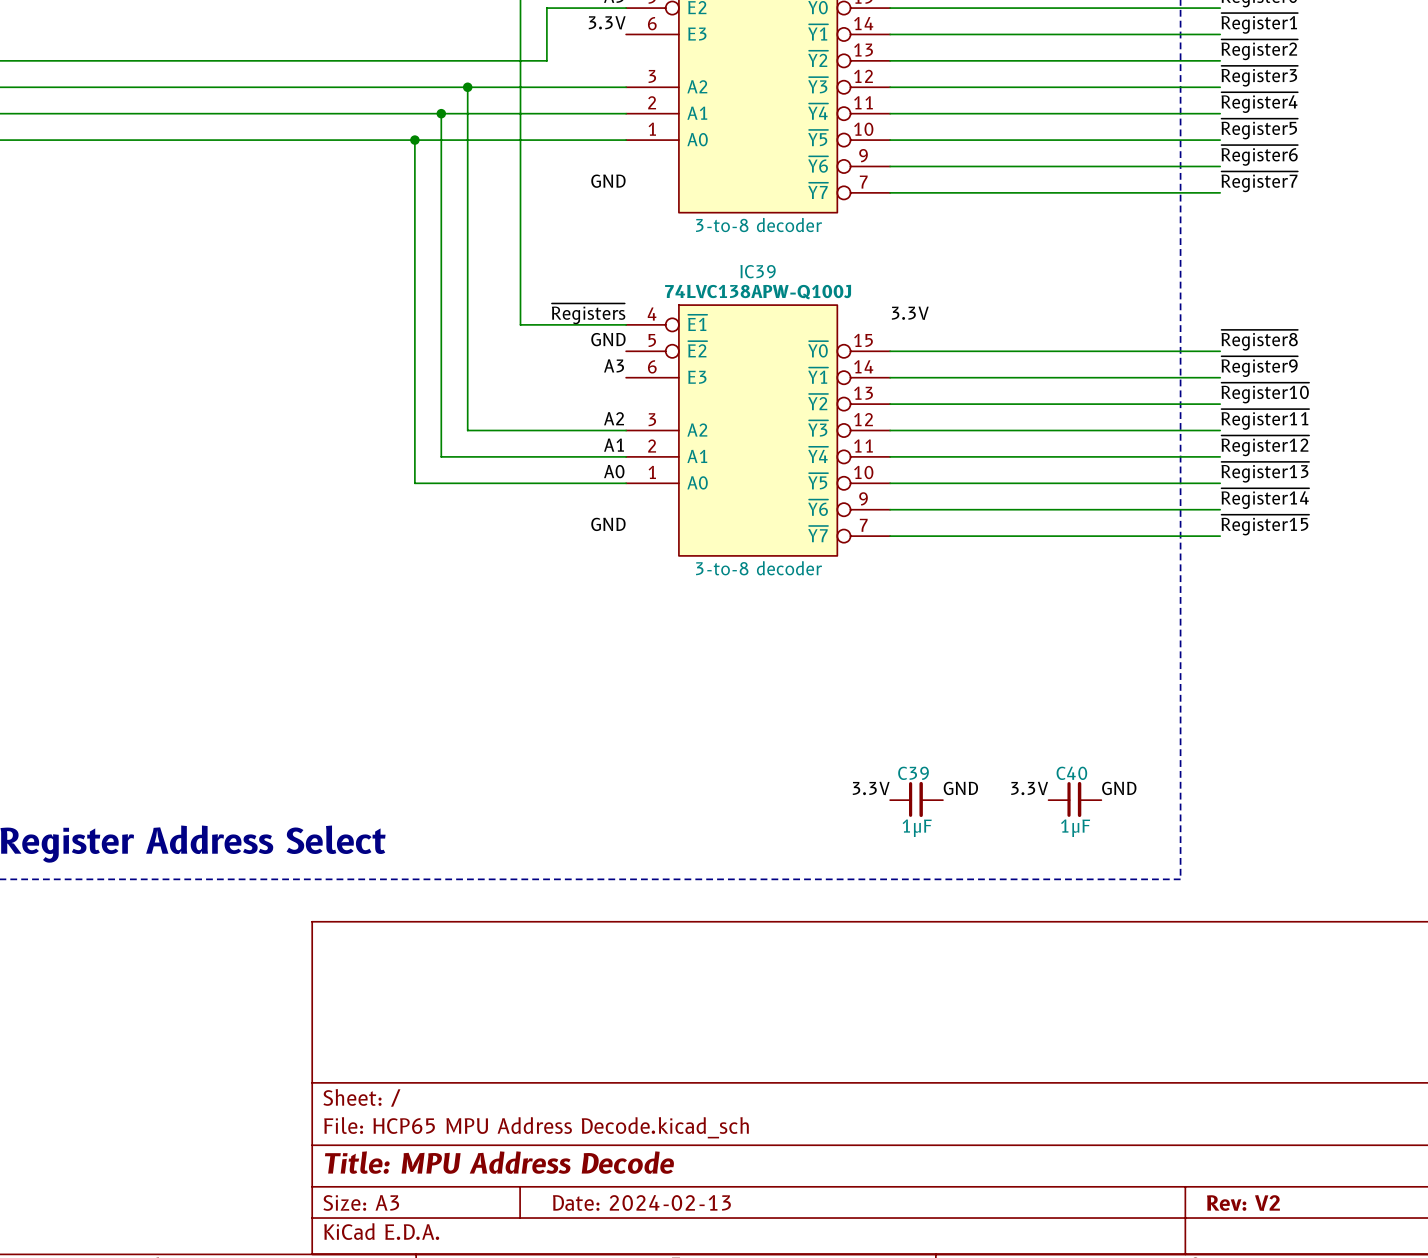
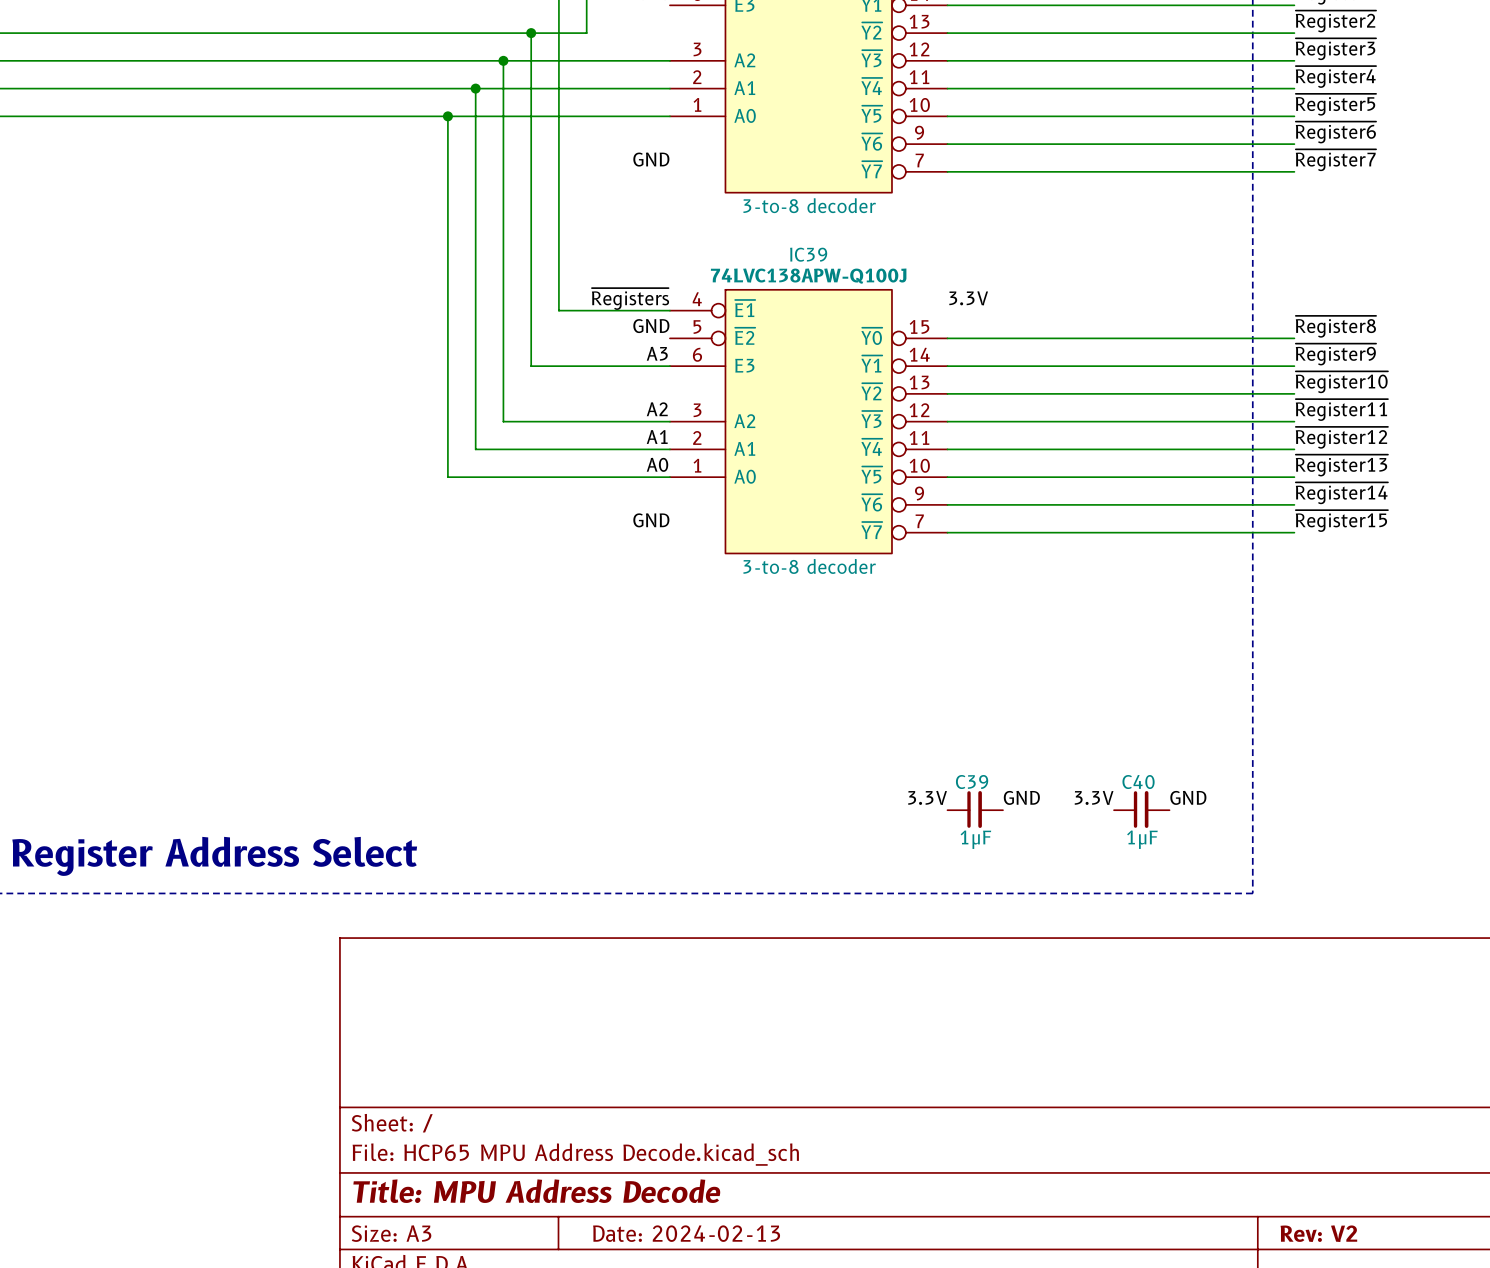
wire: none -> (531, 33) (531, 366) (669, 366)
junction: none -> (531, 33)

